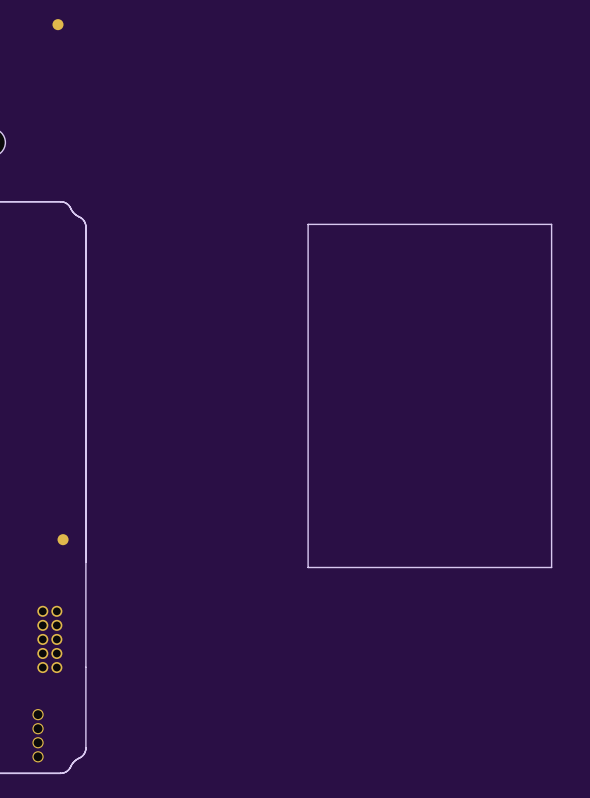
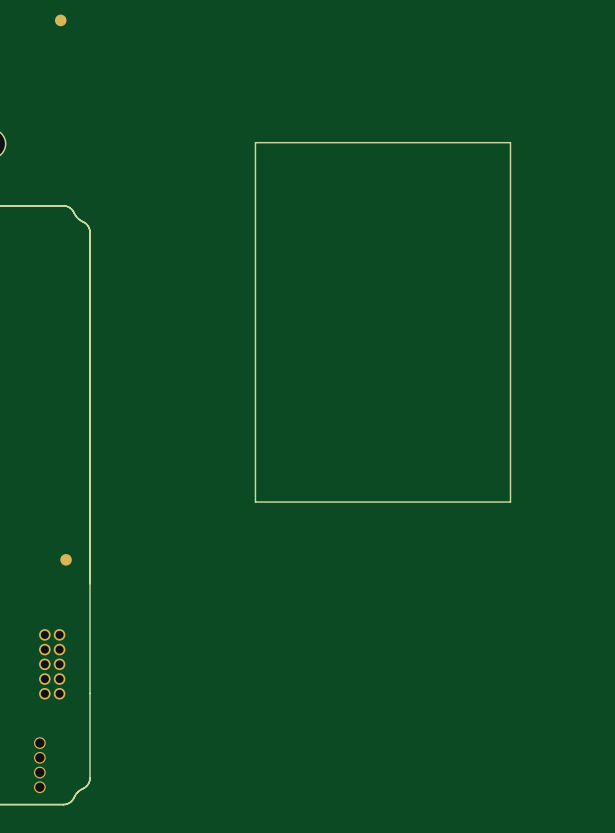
board edge: (551, 224) (308, 224) (308, 567) (551, 567) (551, 224) -> (510, 142) (255, 142) (255, 502) (510, 502) (510, 142)

